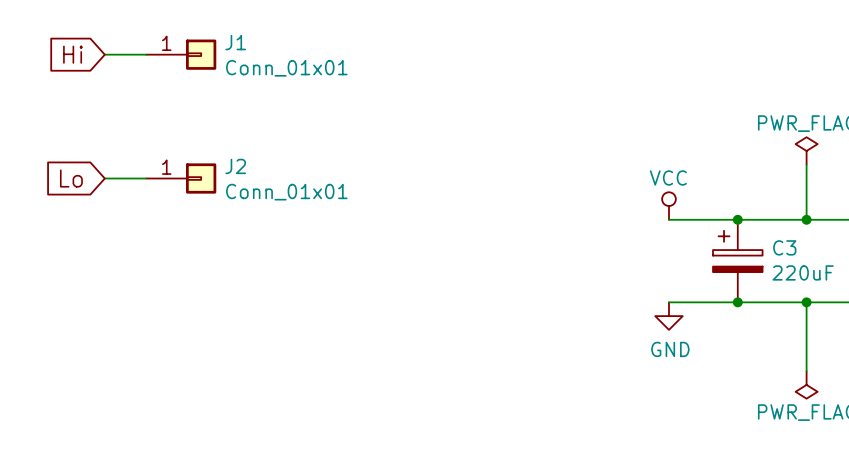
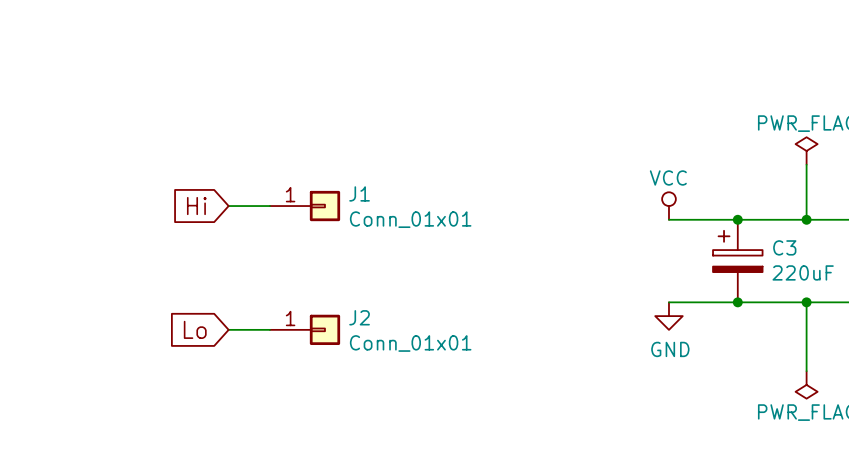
global label position: Hi (72, 54) -> Hi (196, 206)
wire: (104, 54) (146, 54) -> (228, 206) (269, 206)
J1 position: (181, 54) -> (305, 206)
global label position: Lo (71, 178) -> Lo (195, 329)
wire: (104, 178) (146, 178) -> (228, 329) (269, 329)
J2 position: (181, 178) -> (305, 329)

